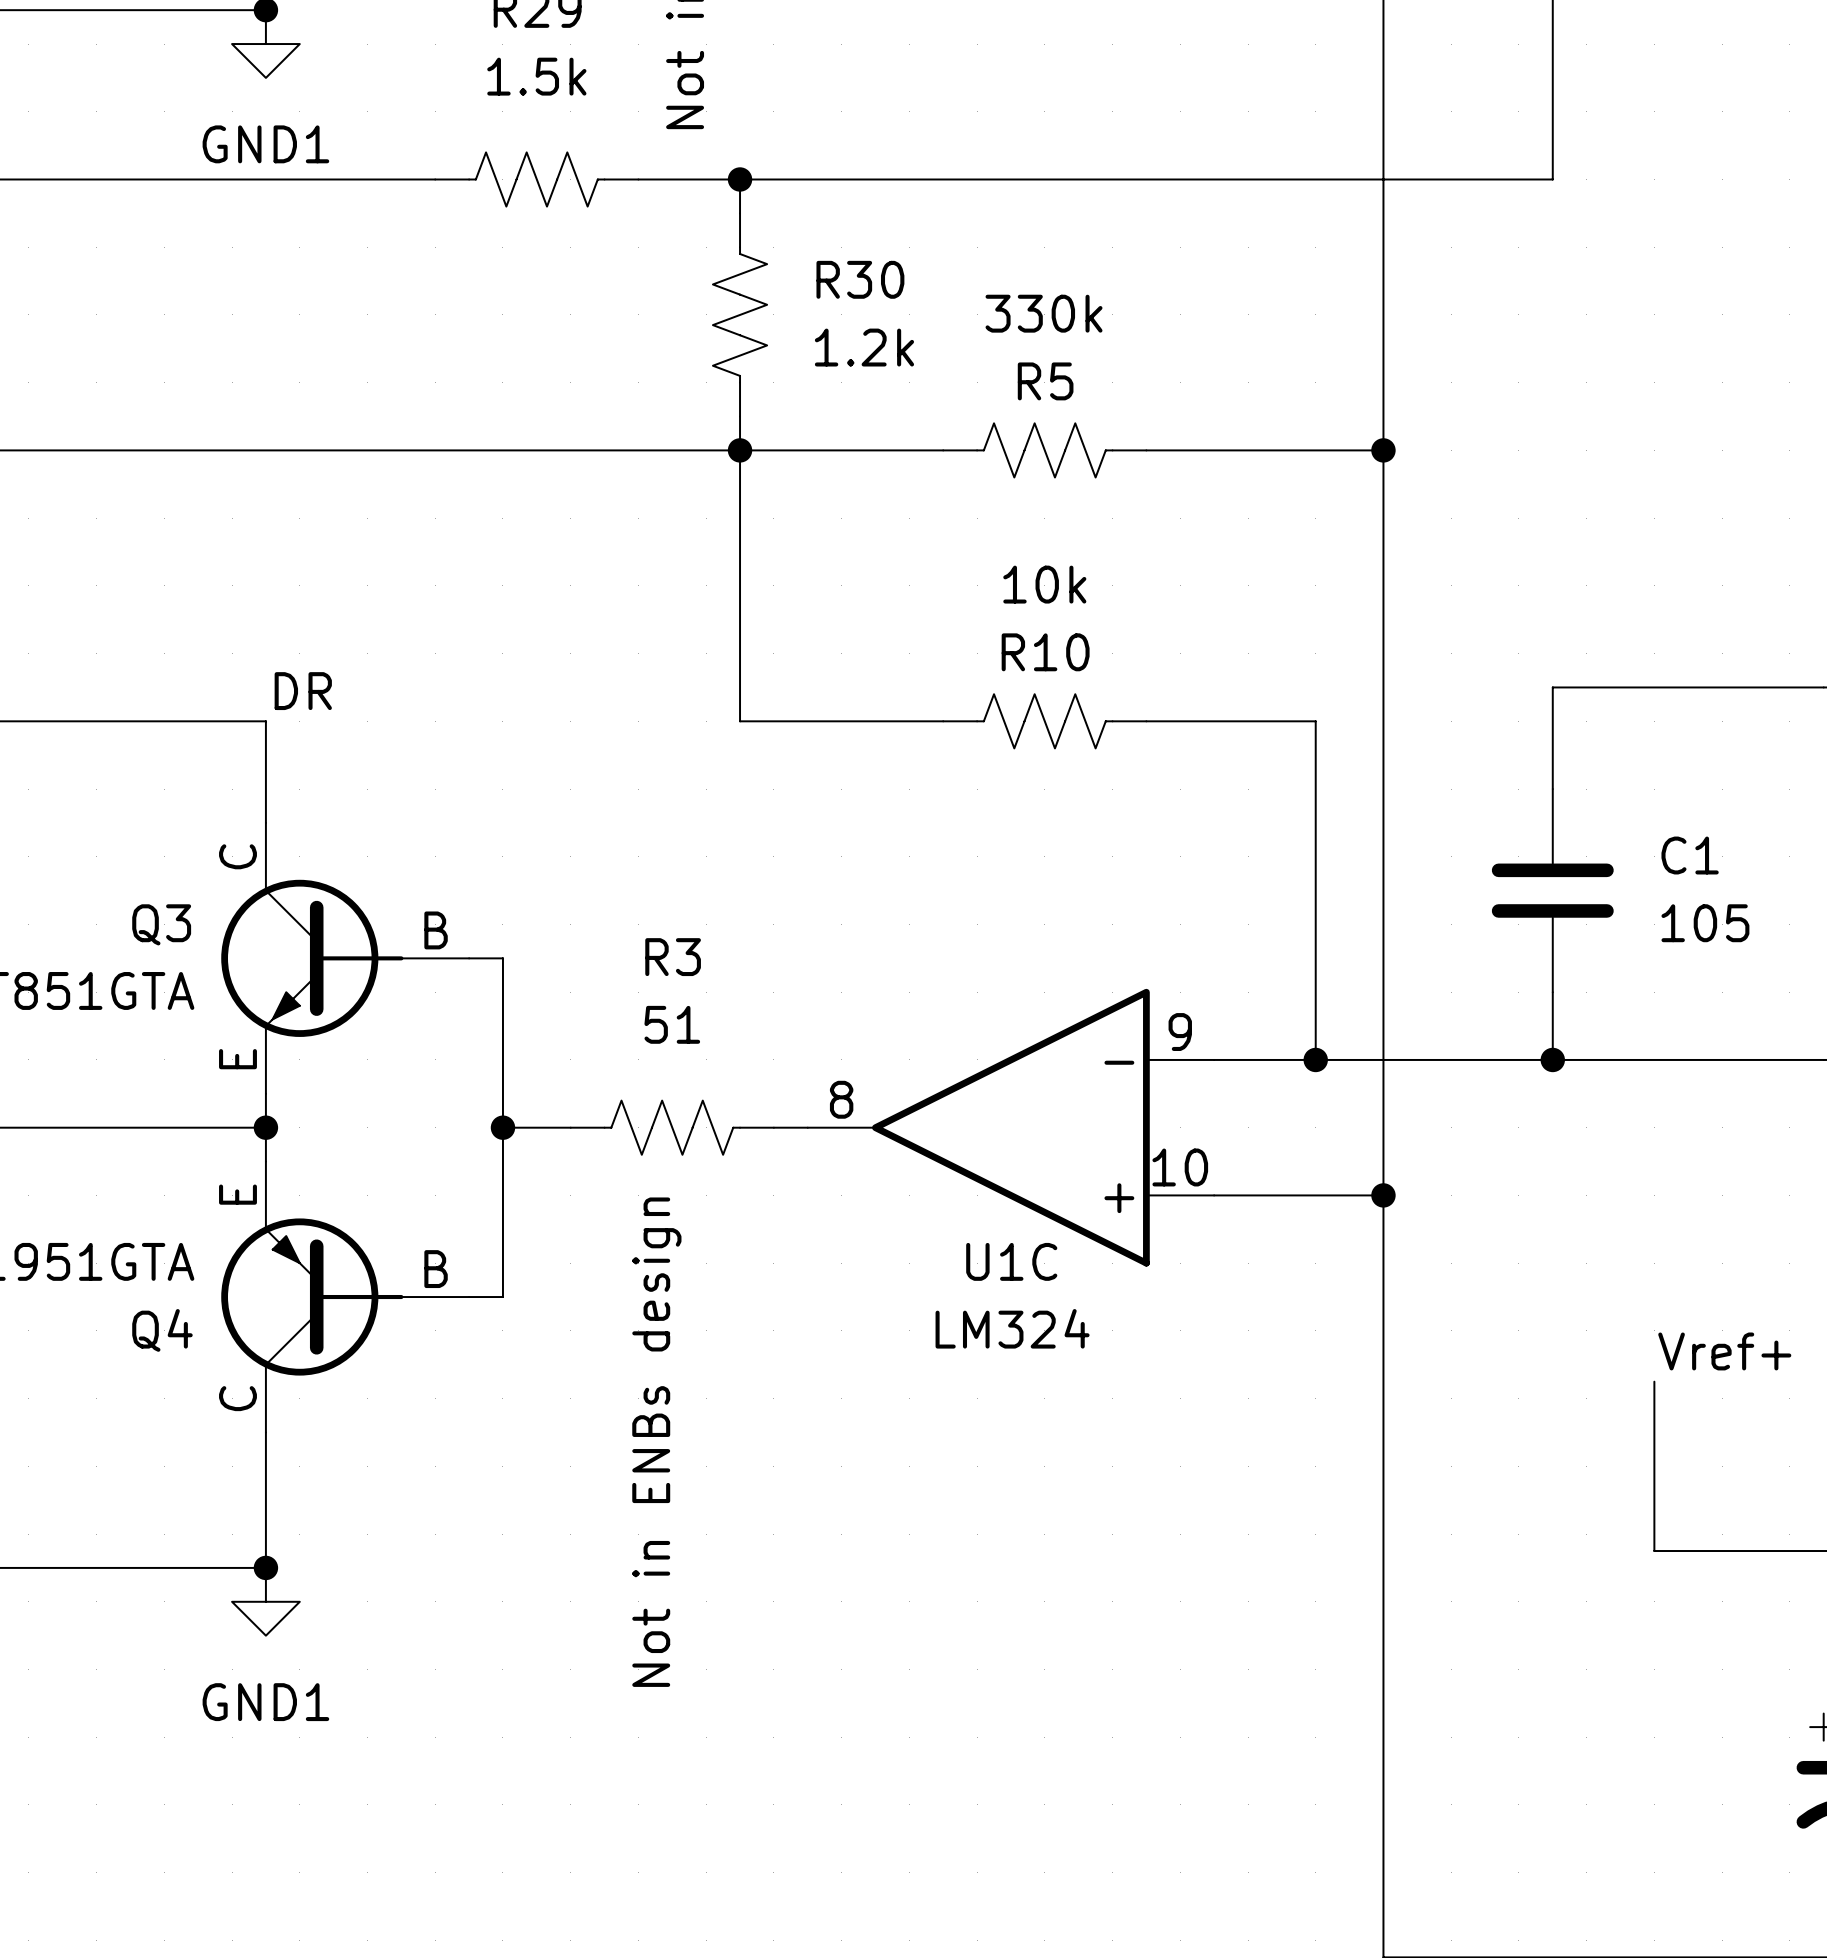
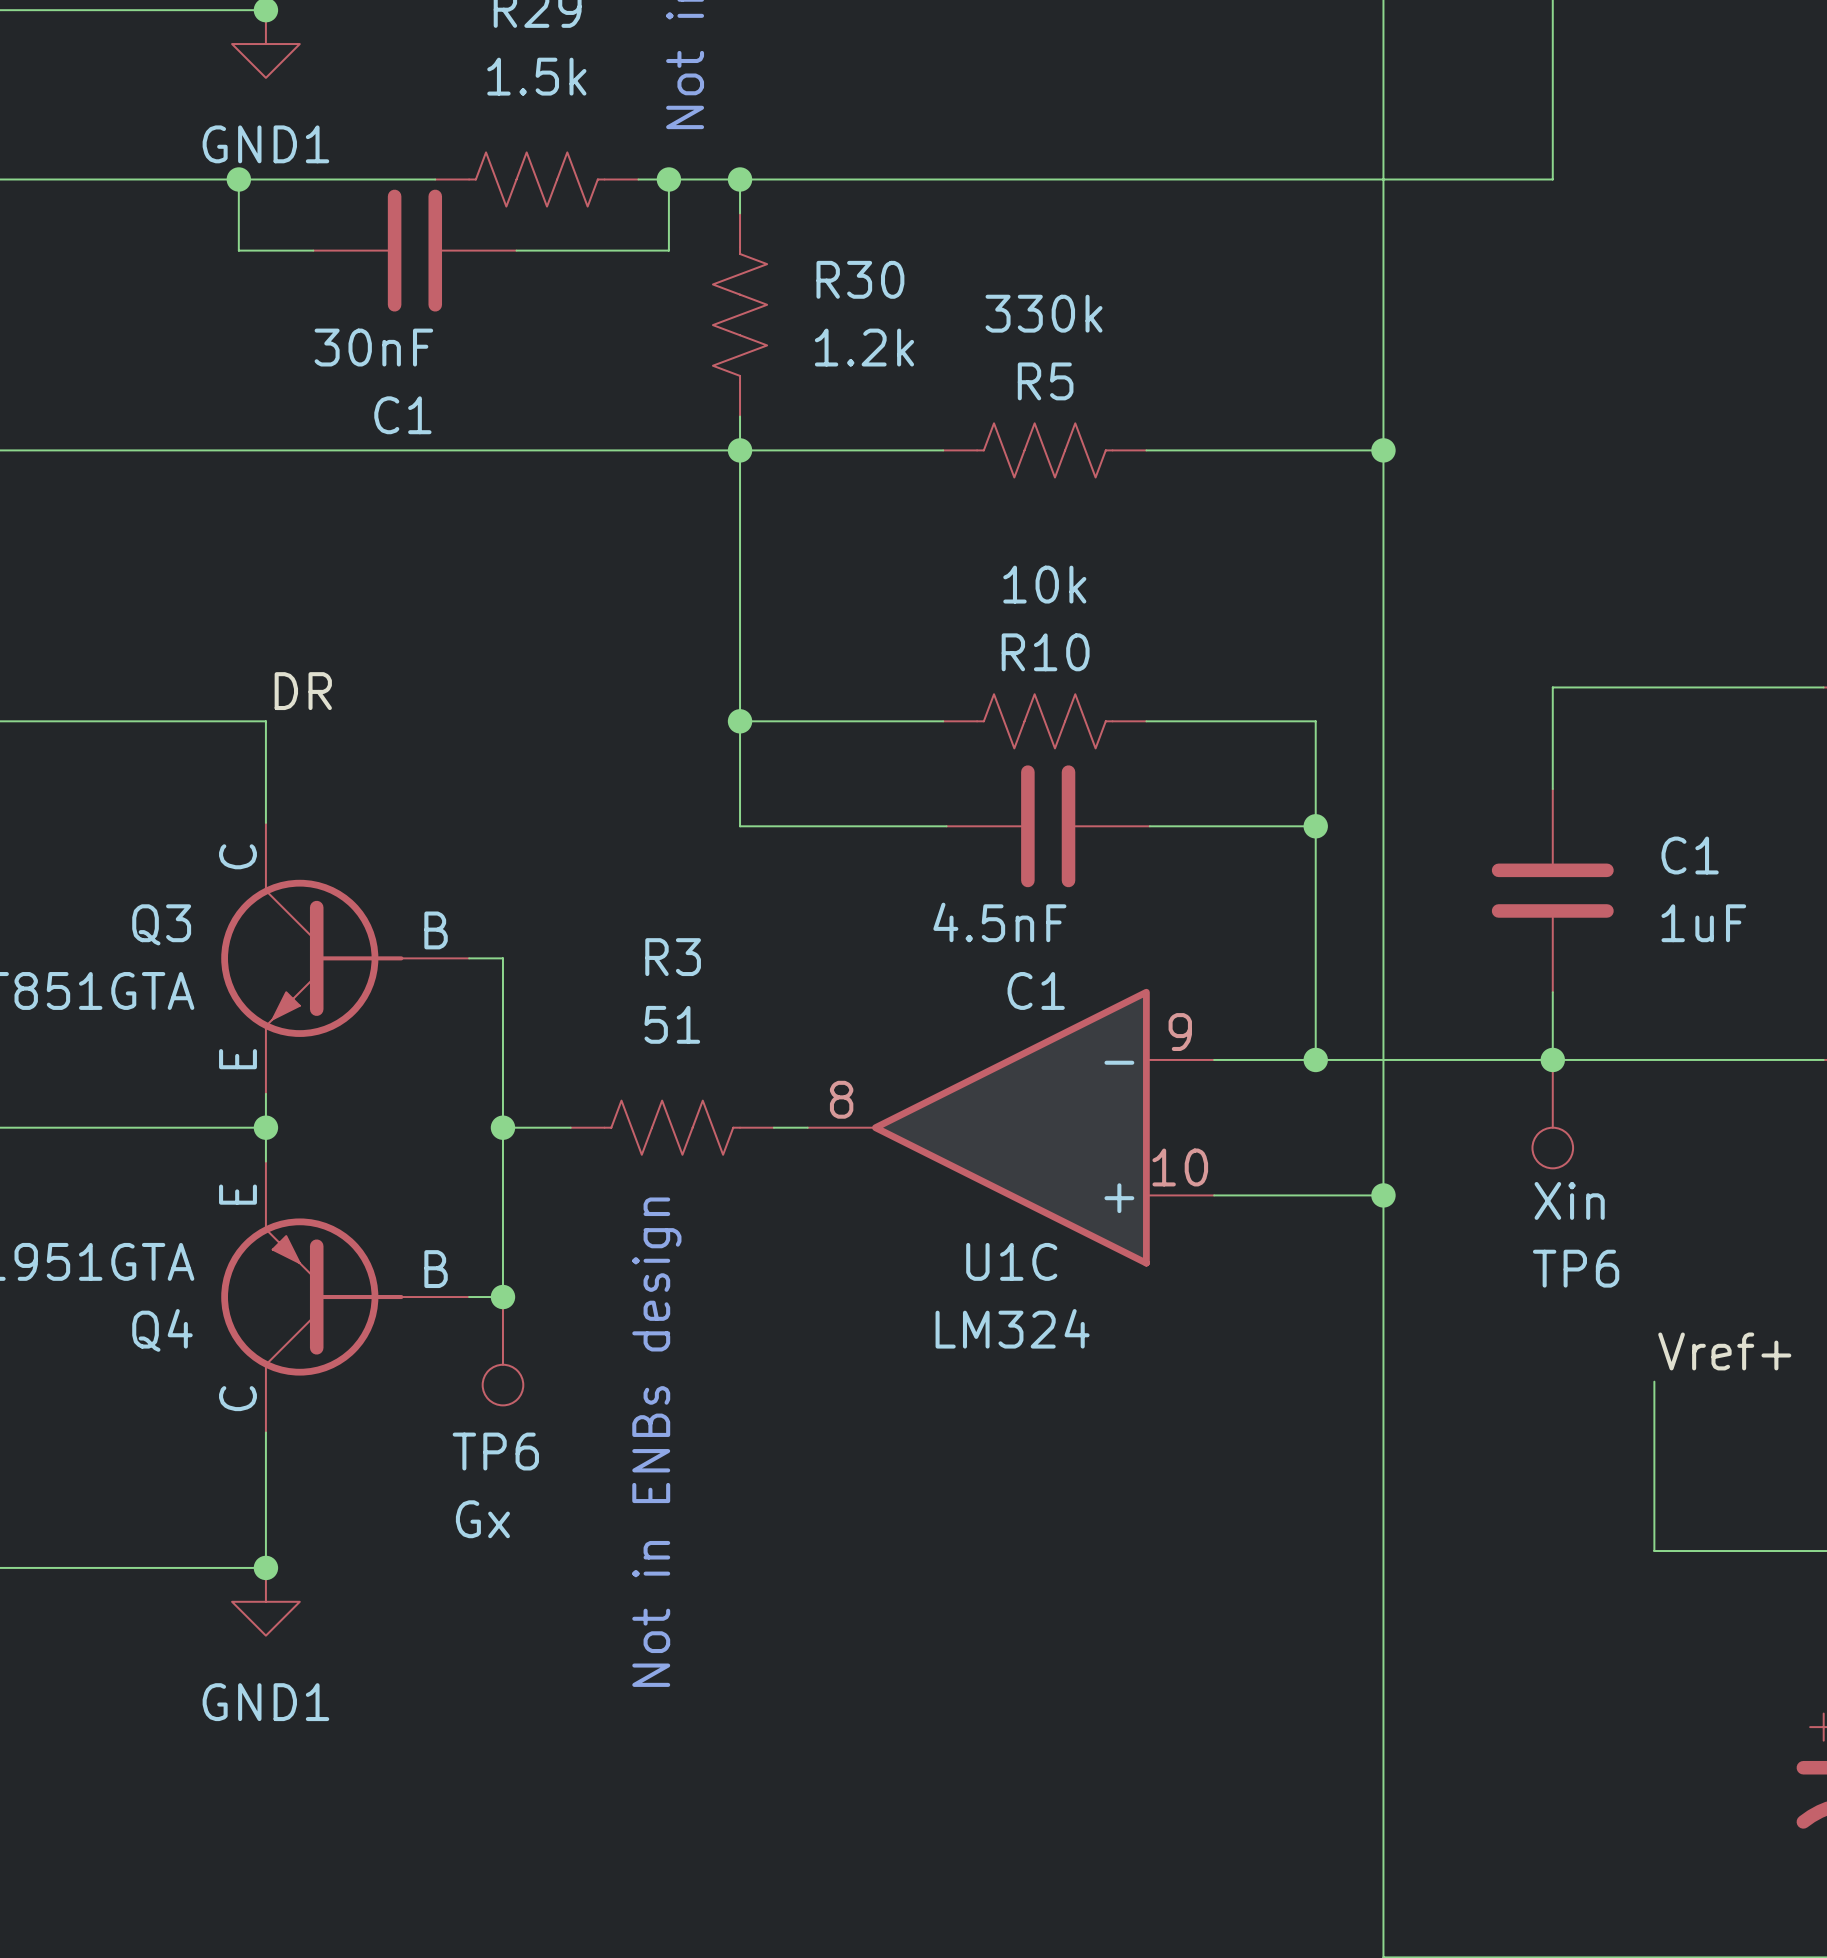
wire: none -> (238, 179) (238, 250) (313, 250)
junction: none -> (238, 179)
wire: none -> (668, 179) (668, 250) (516, 250)
junction: none -> (668, 179)
C1: none -> 30nF (414, 250)
wire: none -> (740, 721) (740, 826) (946, 826)
junction: none -> (740, 721)
C1: none -> 4.5nF (1048, 826)
wire: none -> (1149, 826) (1315, 826)
junction: none -> (1315, 826)
C1 value: 105 (1705, 923) -> 1uF (1703, 923)
TP6: none -> Xin (1552, 1114)
junction: none -> (502, 1297)
TP6: none -> Gx (502, 1351)

